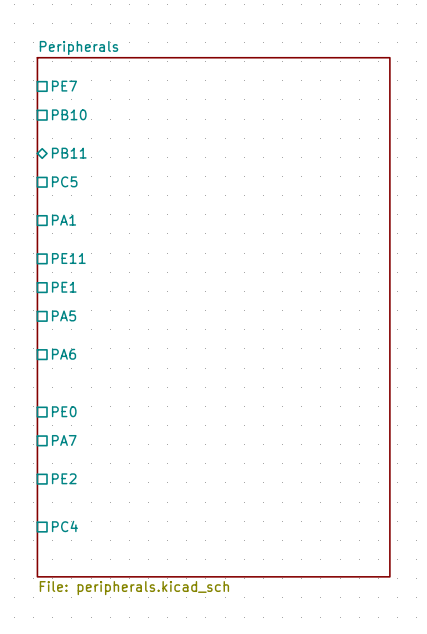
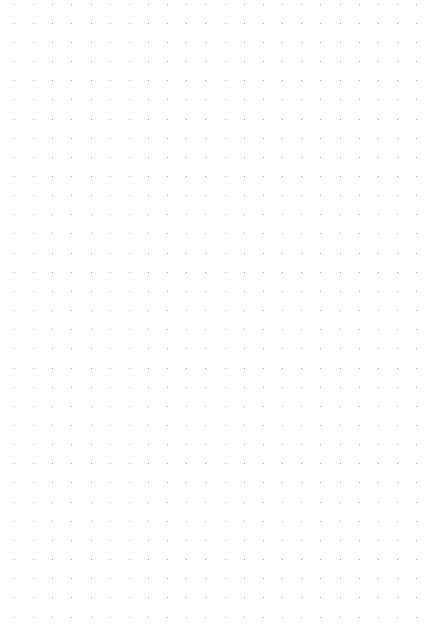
sheet pin: PE7 (64, 86) -> none
sheet pin: PB10 (69, 114) -> none
sheet pin: PB11 (69, 153) -> none
sheet pin: PC5 (64, 181) -> none
sheet pin: PA1 (64, 220) -> none
sheet pin: PE11 (68, 258) -> none
sheet pin: PE1 (64, 287) -> none
sheet pin: PA5 (64, 315) -> none
sheet Peripherals: File: peripherals.kicad_sch (213, 317) -> none
sheet pin: PA6 (64, 354) -> none
sheet pin: PE0 (64, 411) -> none
sheet pin: PA7 (64, 440) -> none
sheet pin: PE2 (64, 478) -> none
sheet pin: PC4 (64, 526) -> none

